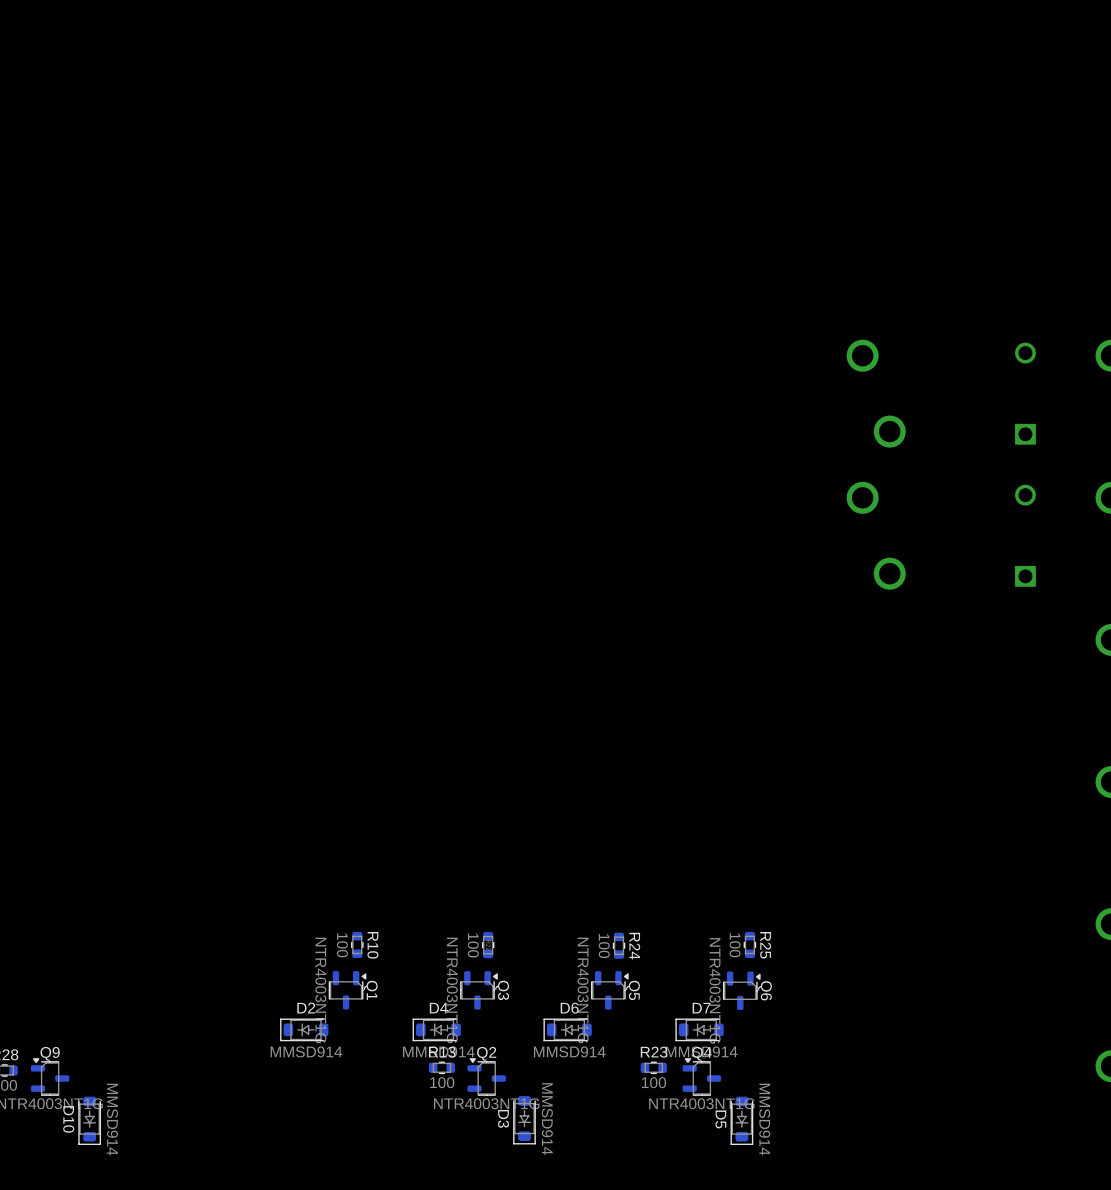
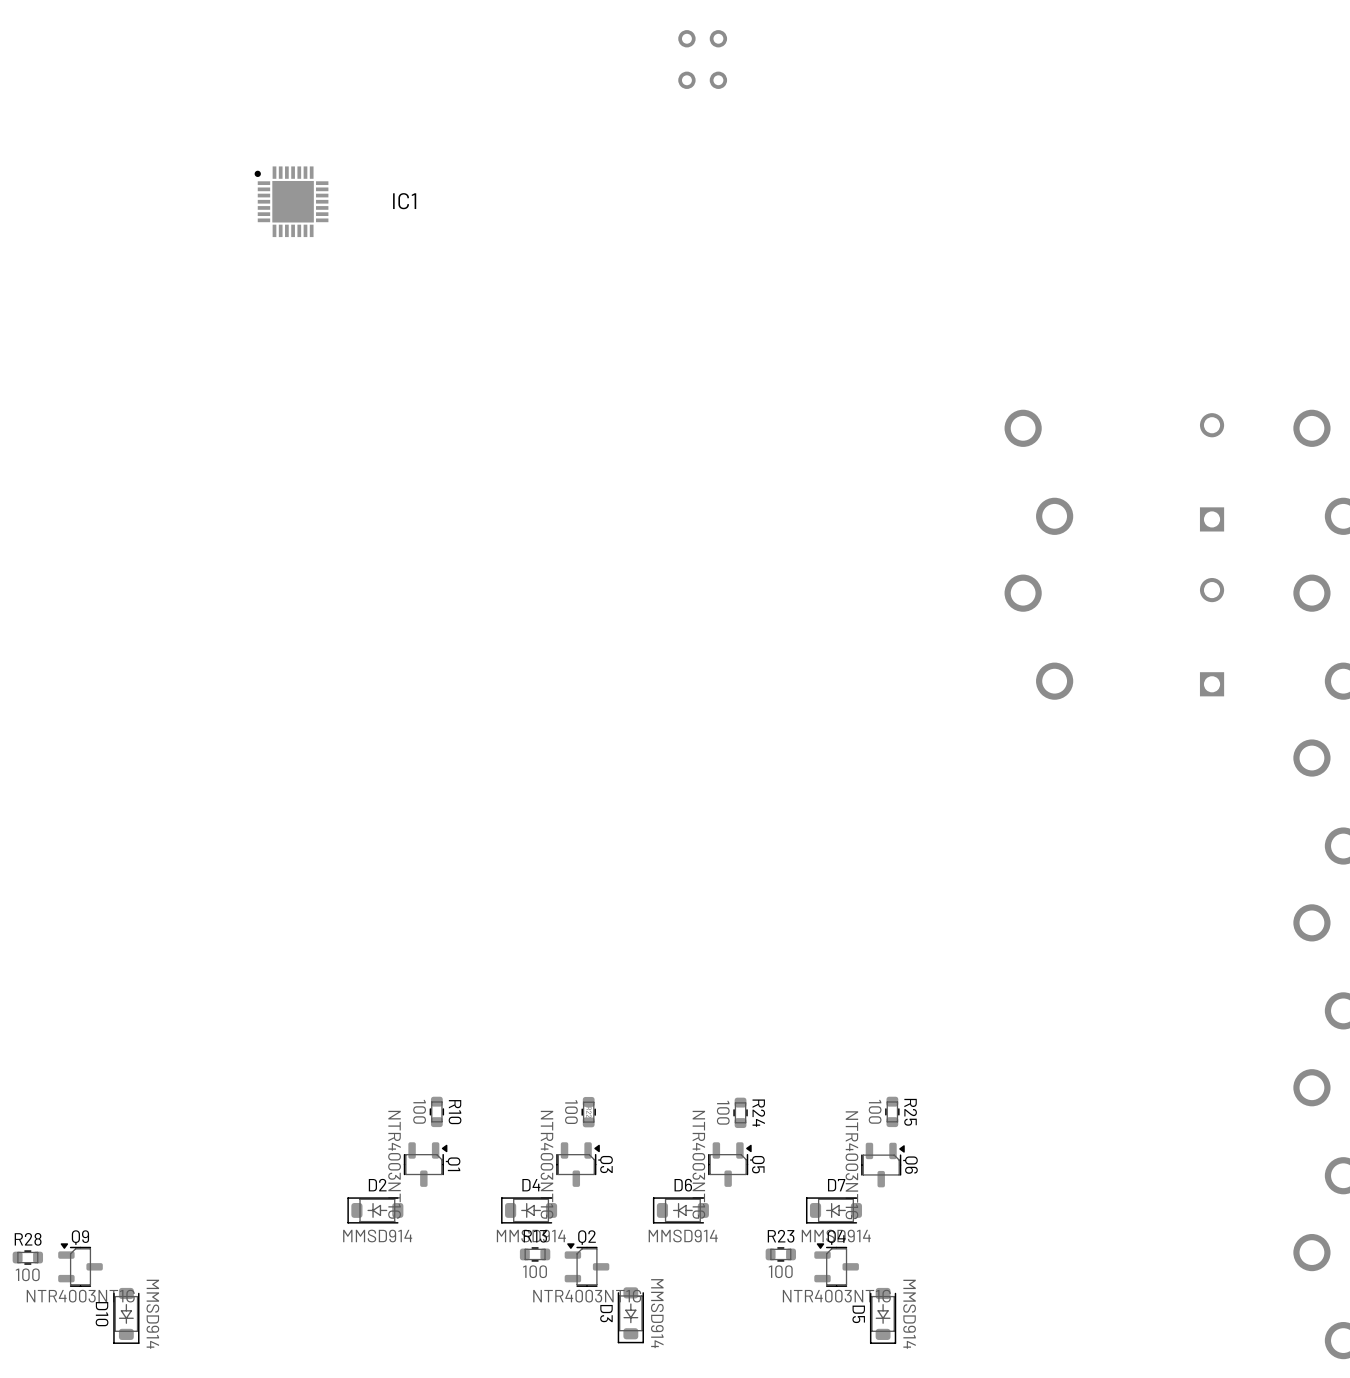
part: none -> (702, 38)
part: none -> (702, 80)
IC1: none -> (291, 201)

